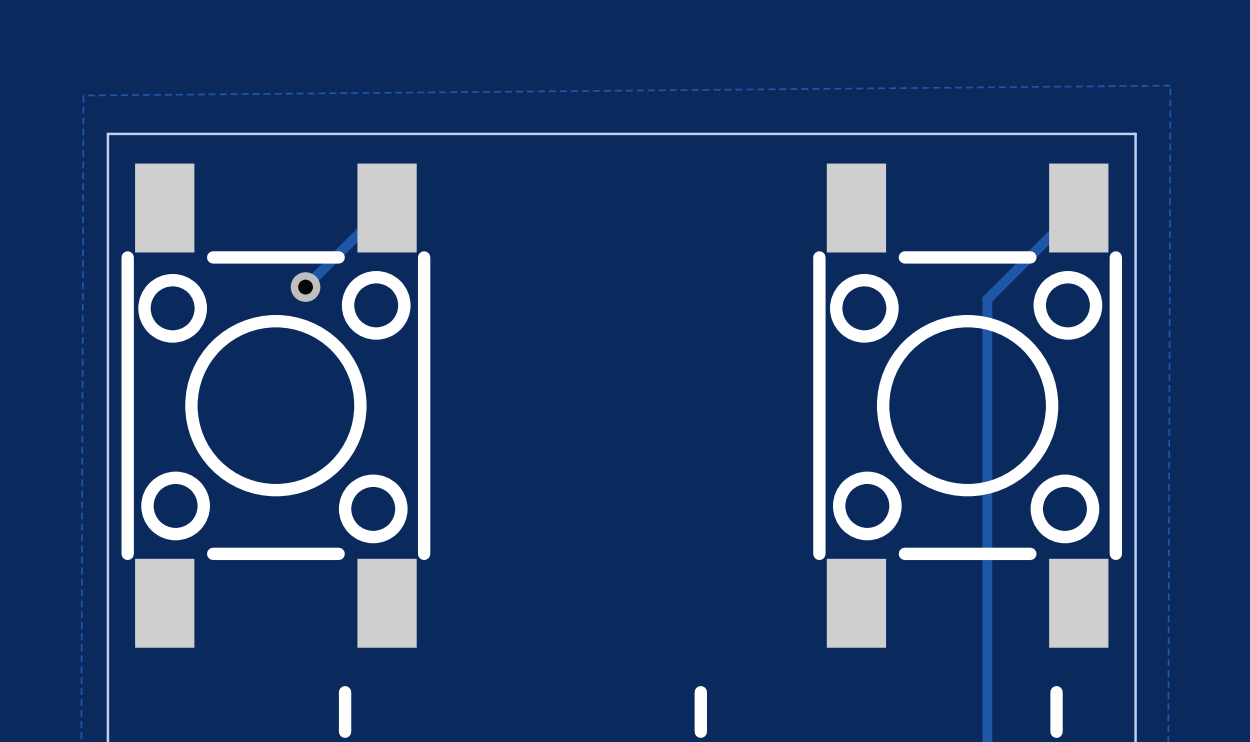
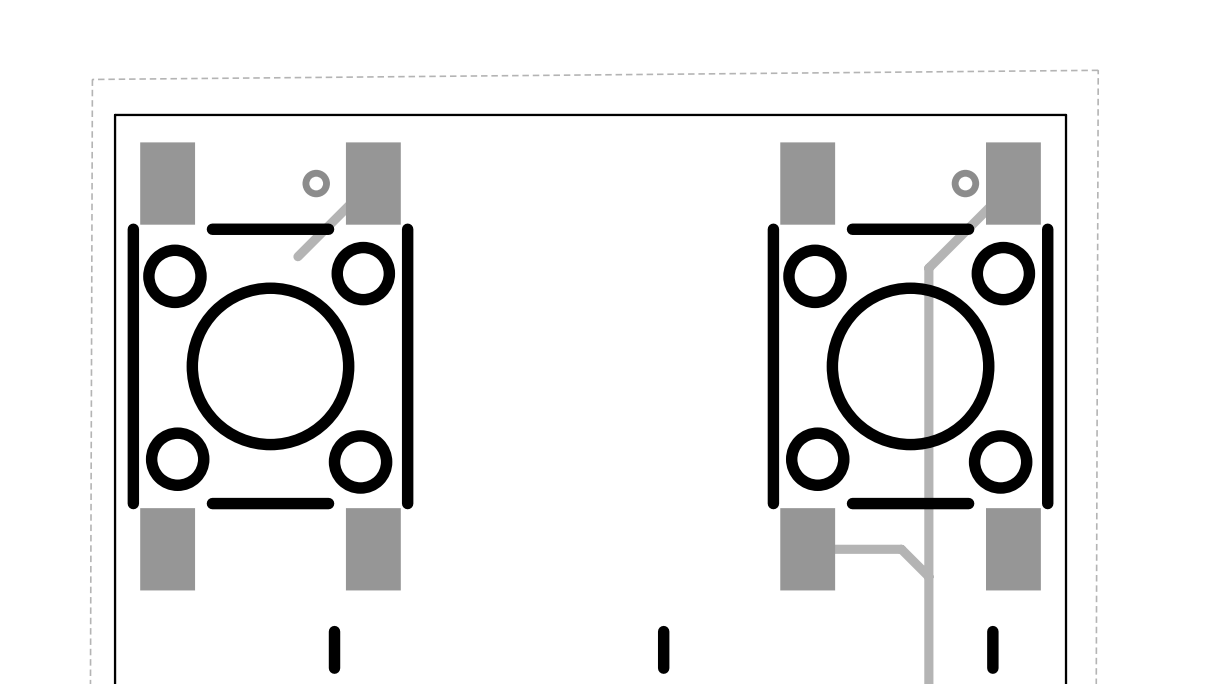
via: none -> (965, 183)
via position: (305, 287) -> (316, 183)
track: none -> (807, 549) (901, 549) (928, 576)

